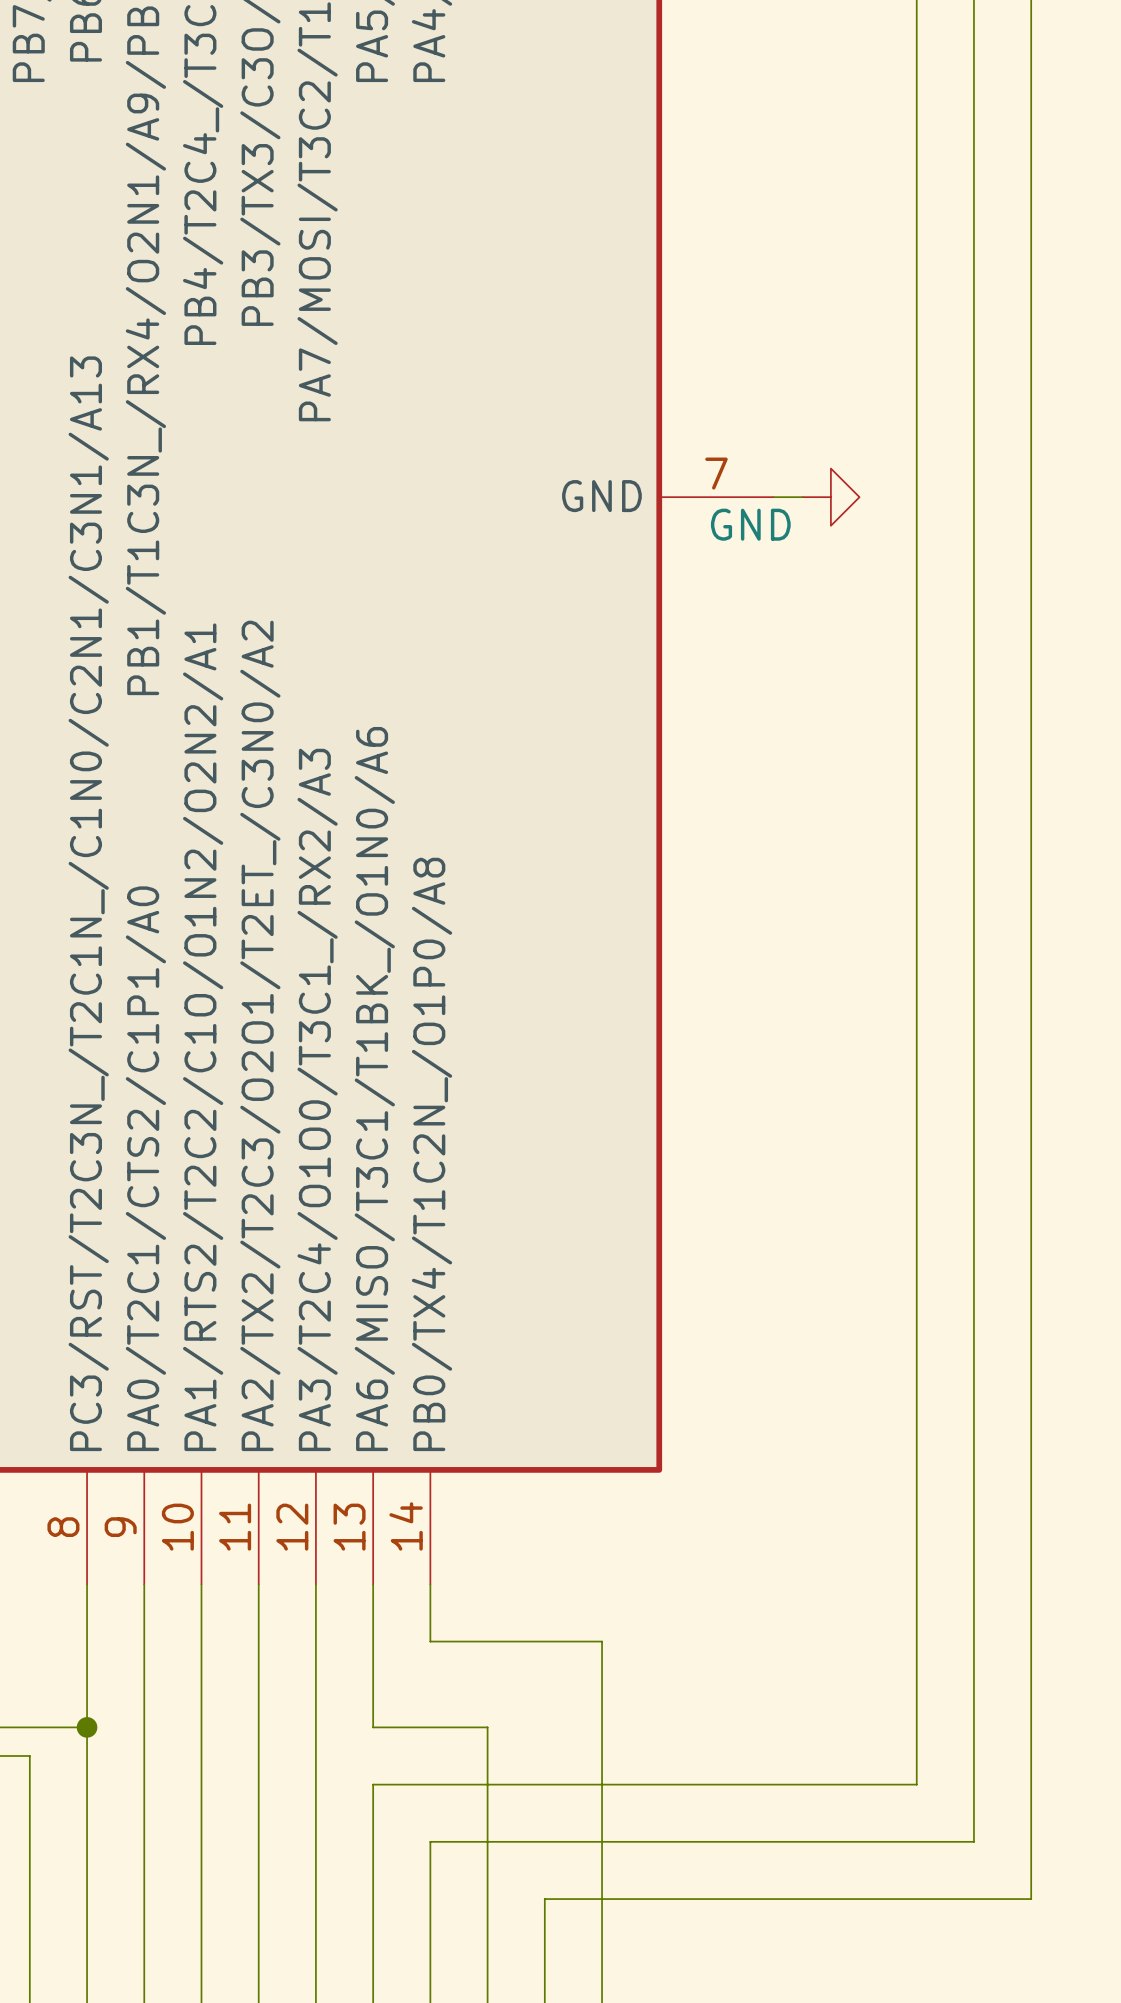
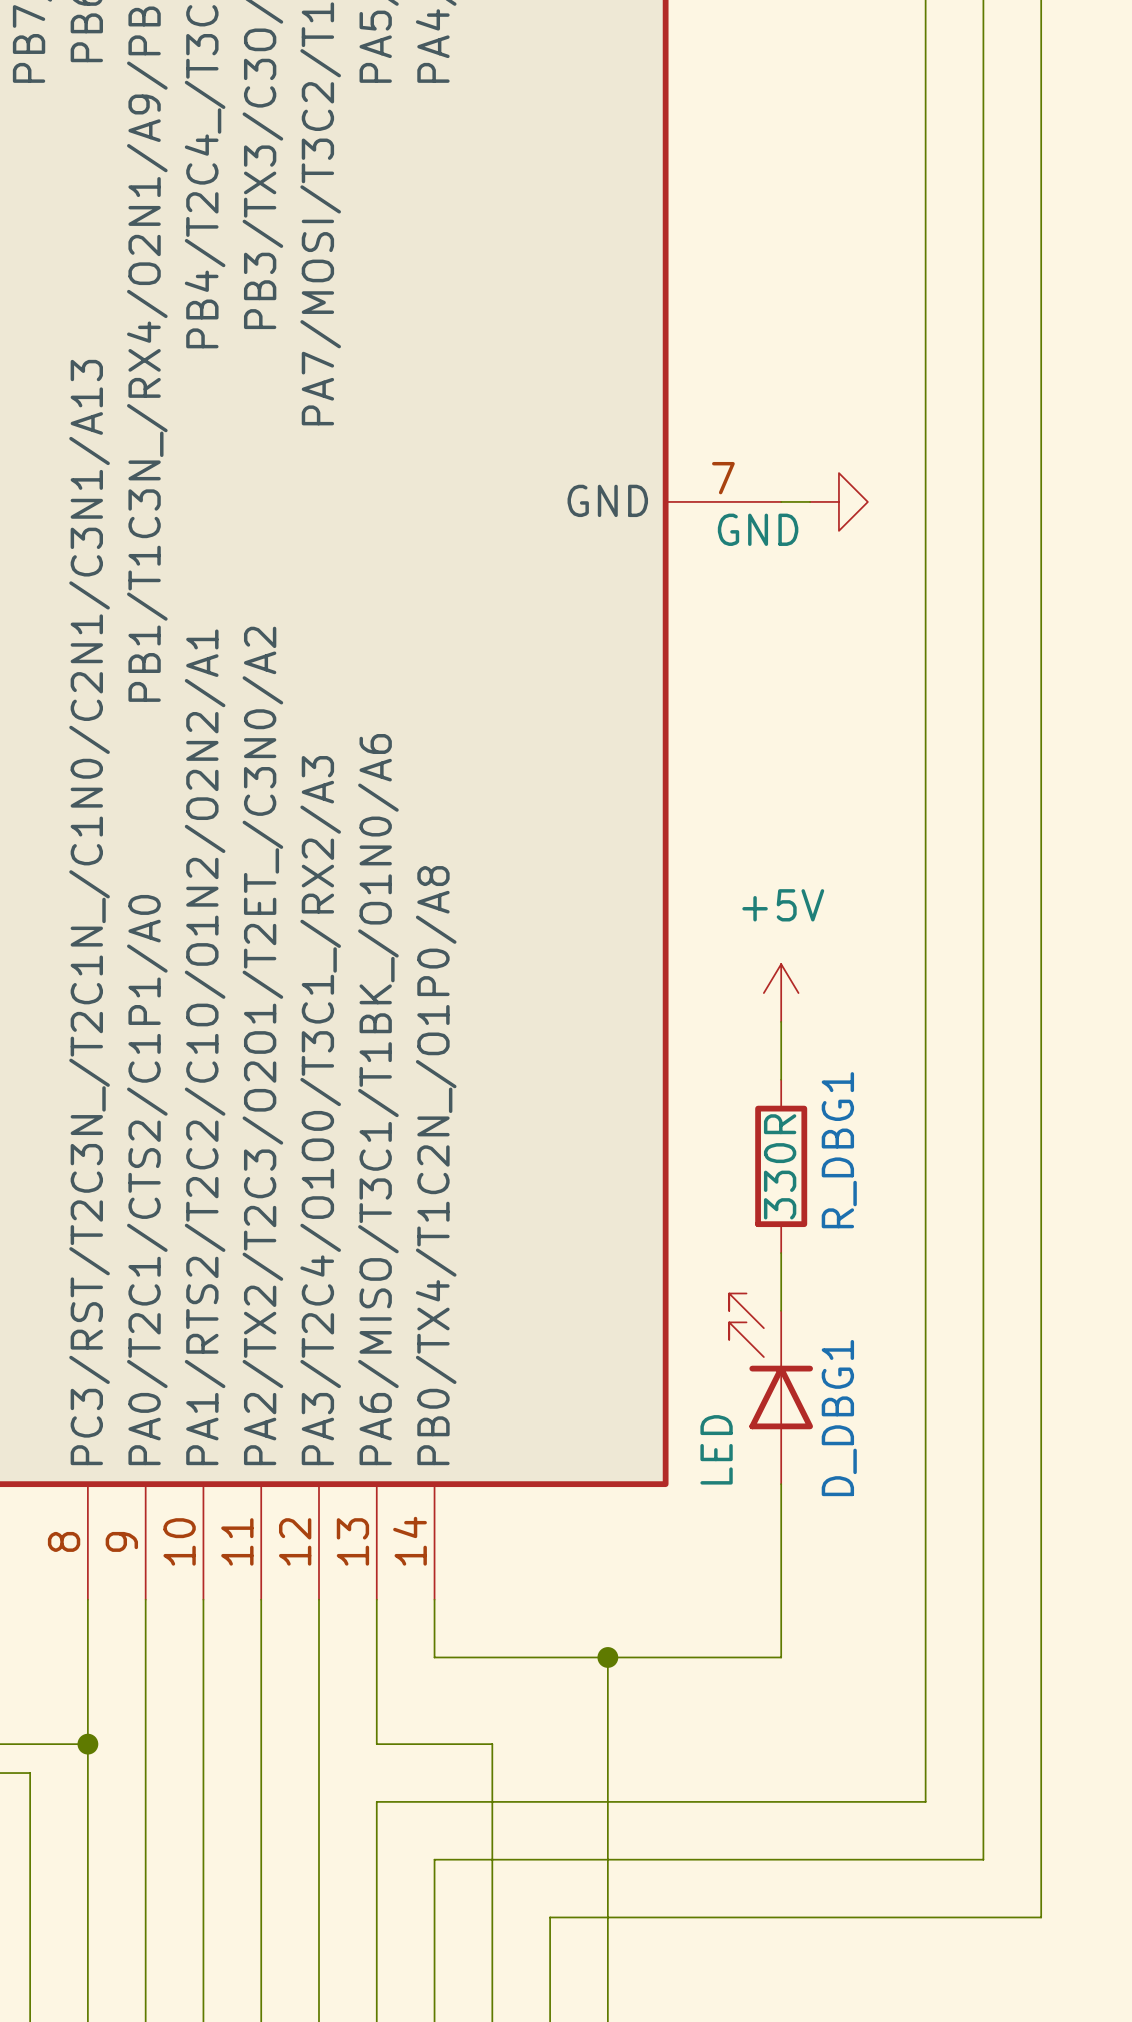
power symbol: none -> +5V (781, 993)
wire: none -> (781, 1021) (781, 1079)
R_DBG1: none -> 330R (781, 1166)
wire: none -> (781, 1253) (781, 1310)
D_DBG1: none -> LED (771, 1388)
wire: none -> (781, 1484) (781, 1657) (607, 1657)
junction: none -> (607, 1657)

